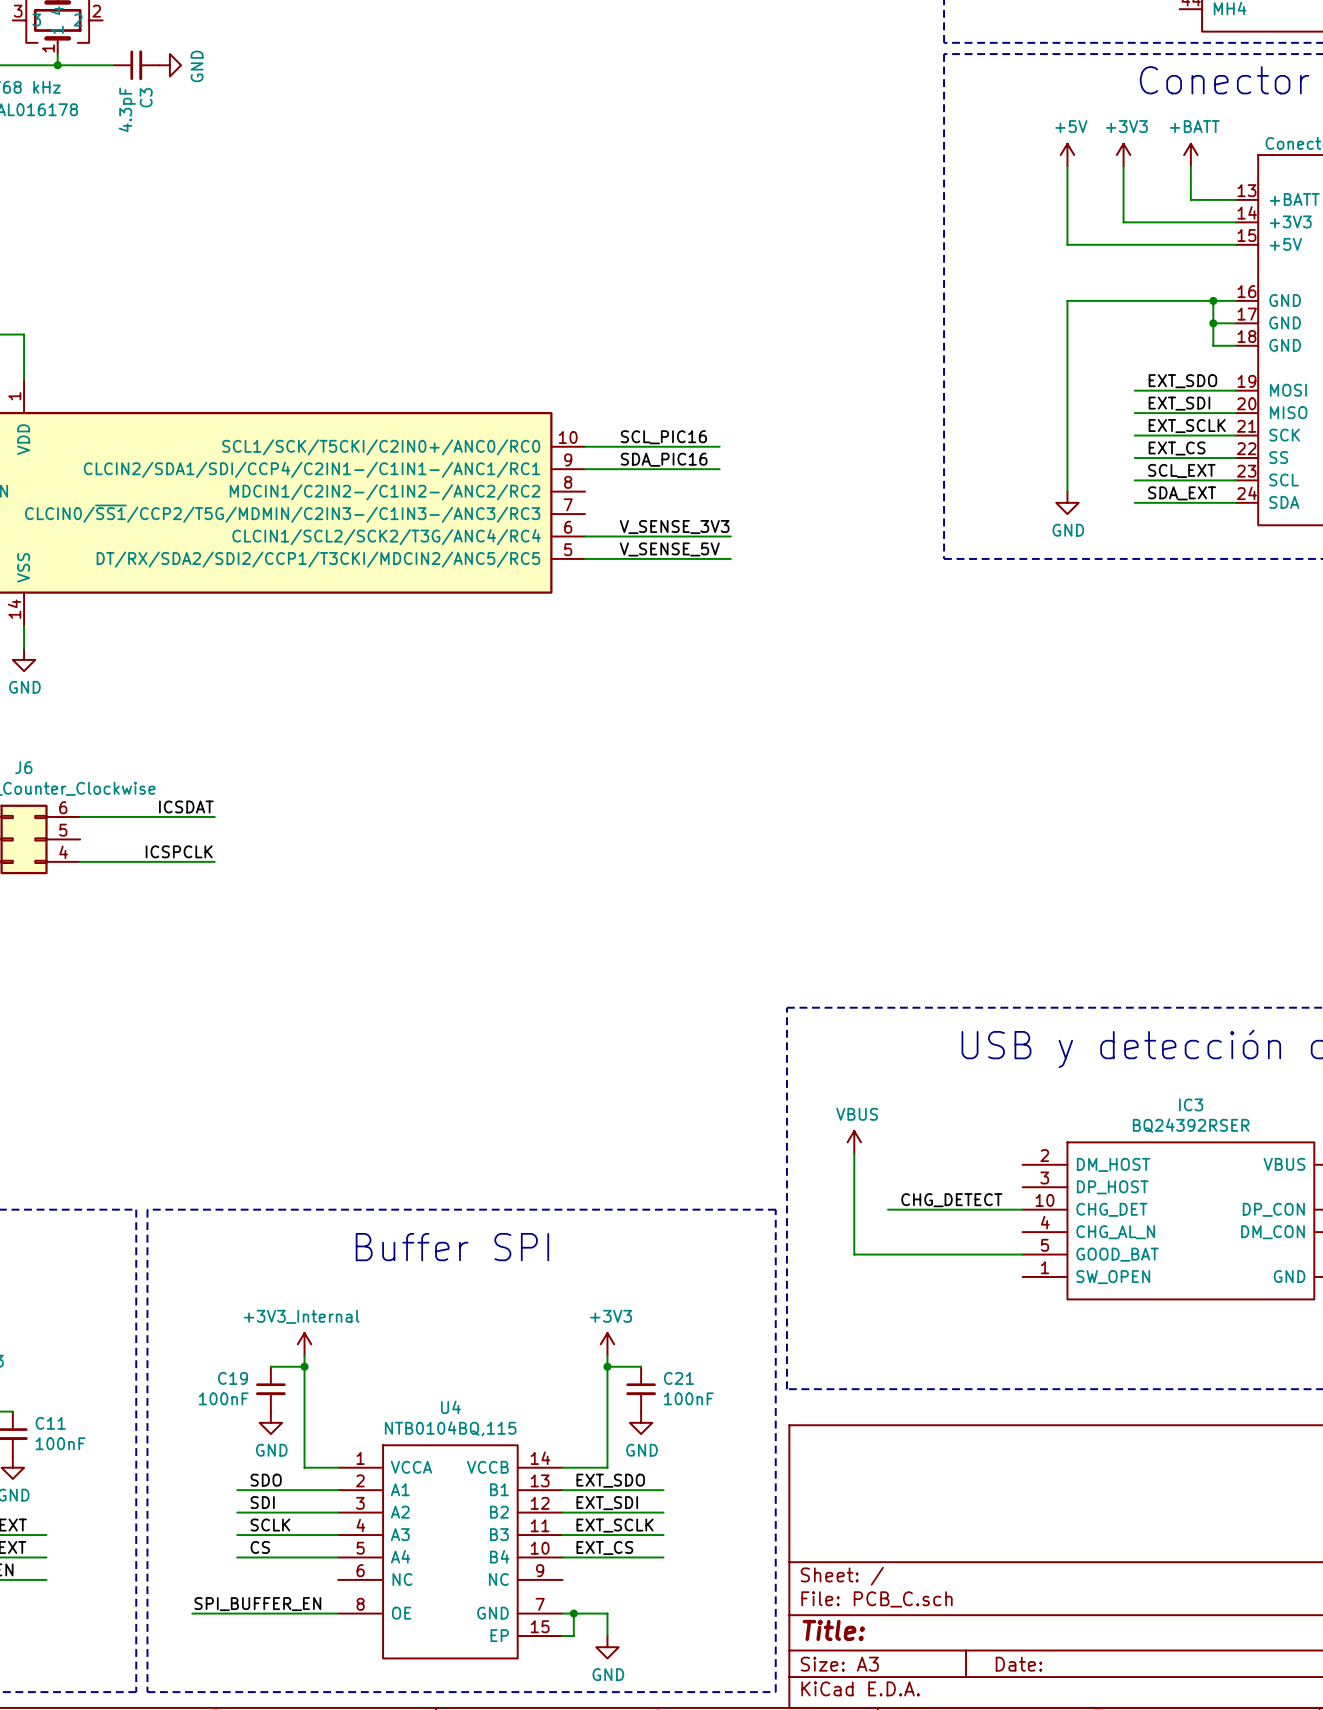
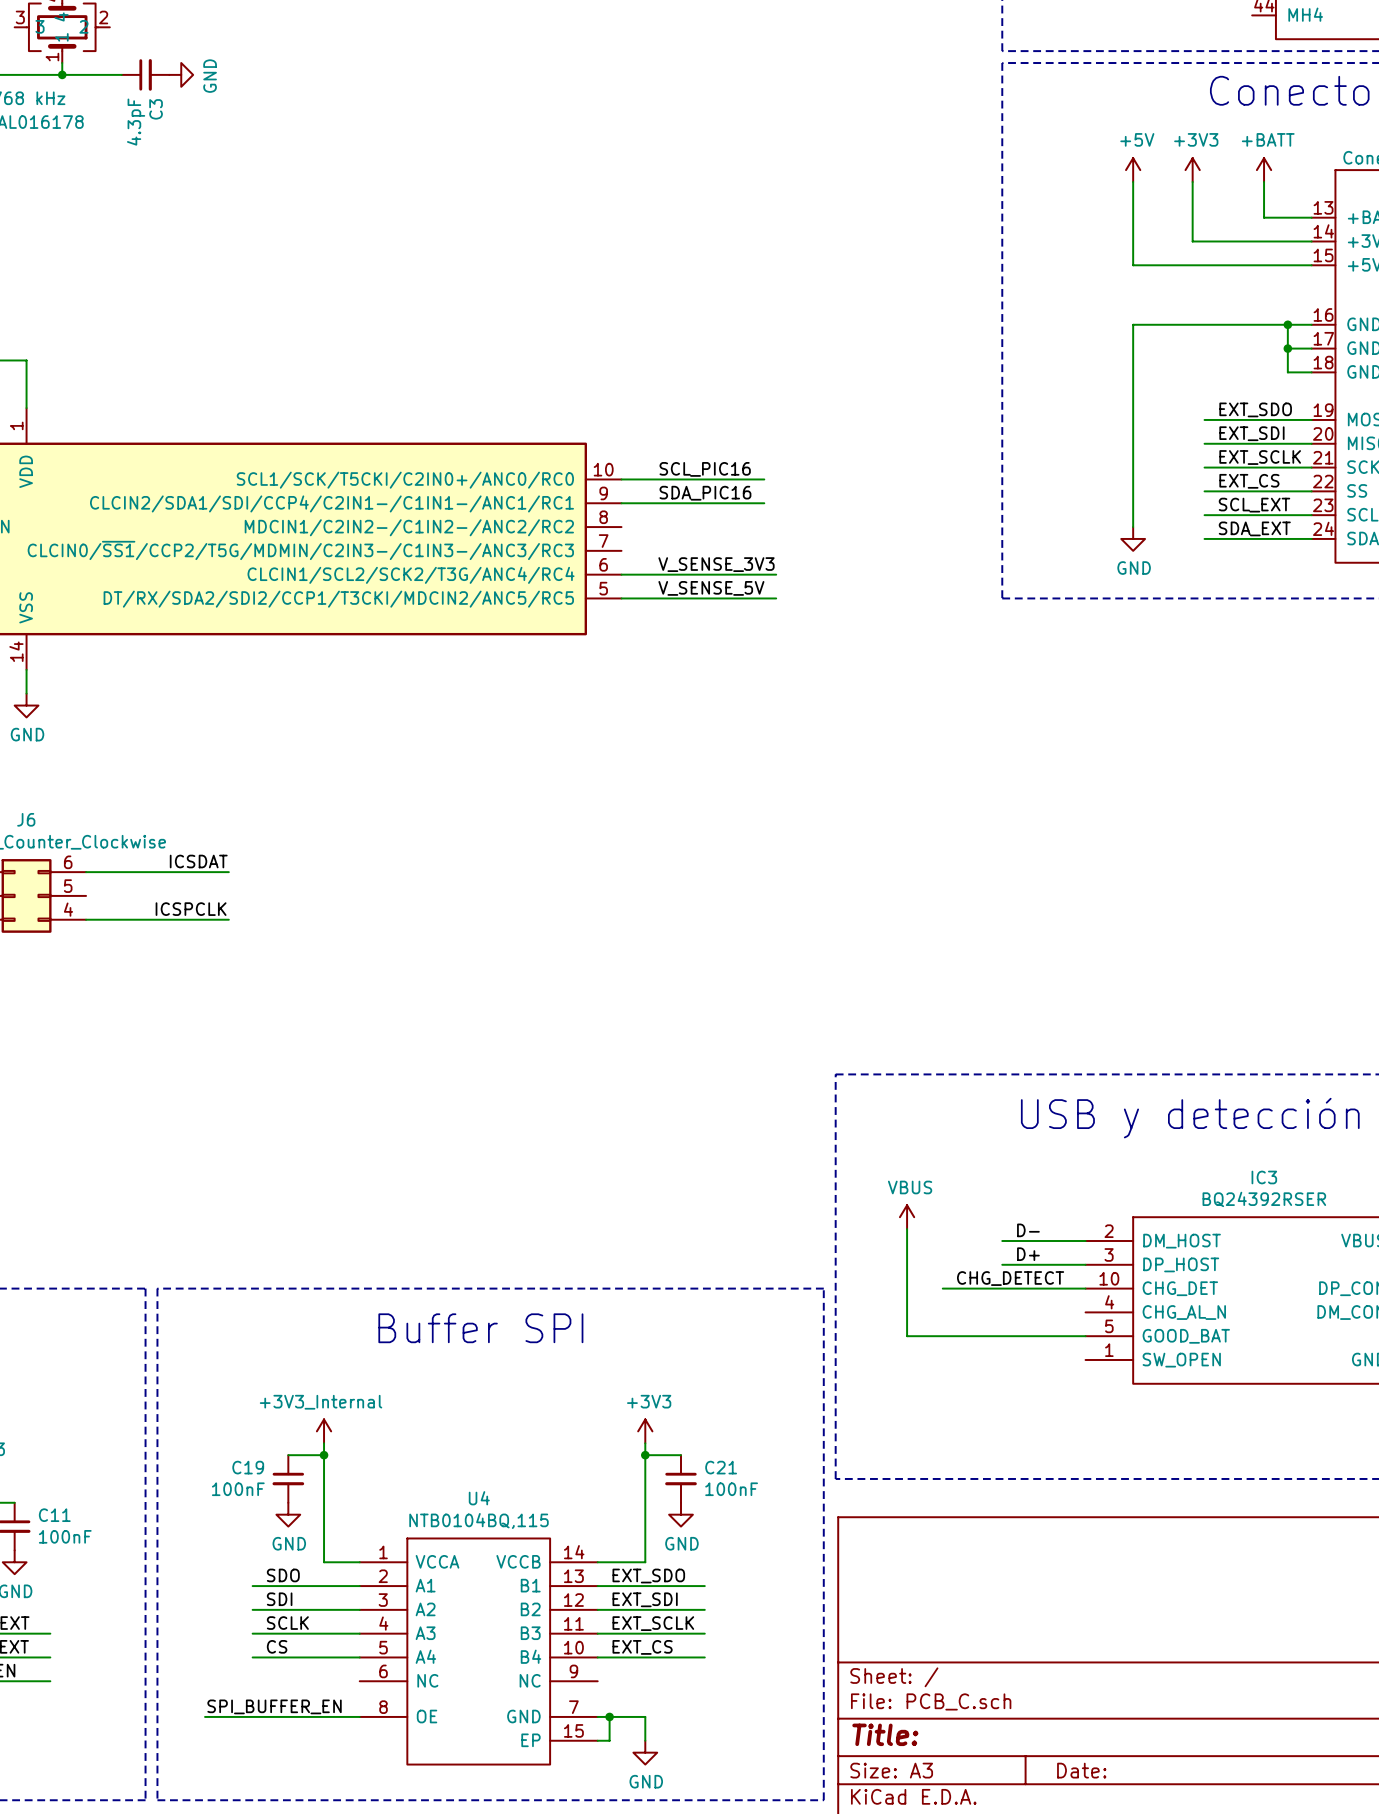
label: none -> D- (1028, 1230)
wire: none -> (1002, 1241) (1085, 1241)
label: none -> D+ (1028, 1254)
wire: none -> (1002, 1264) (1085, 1264)

